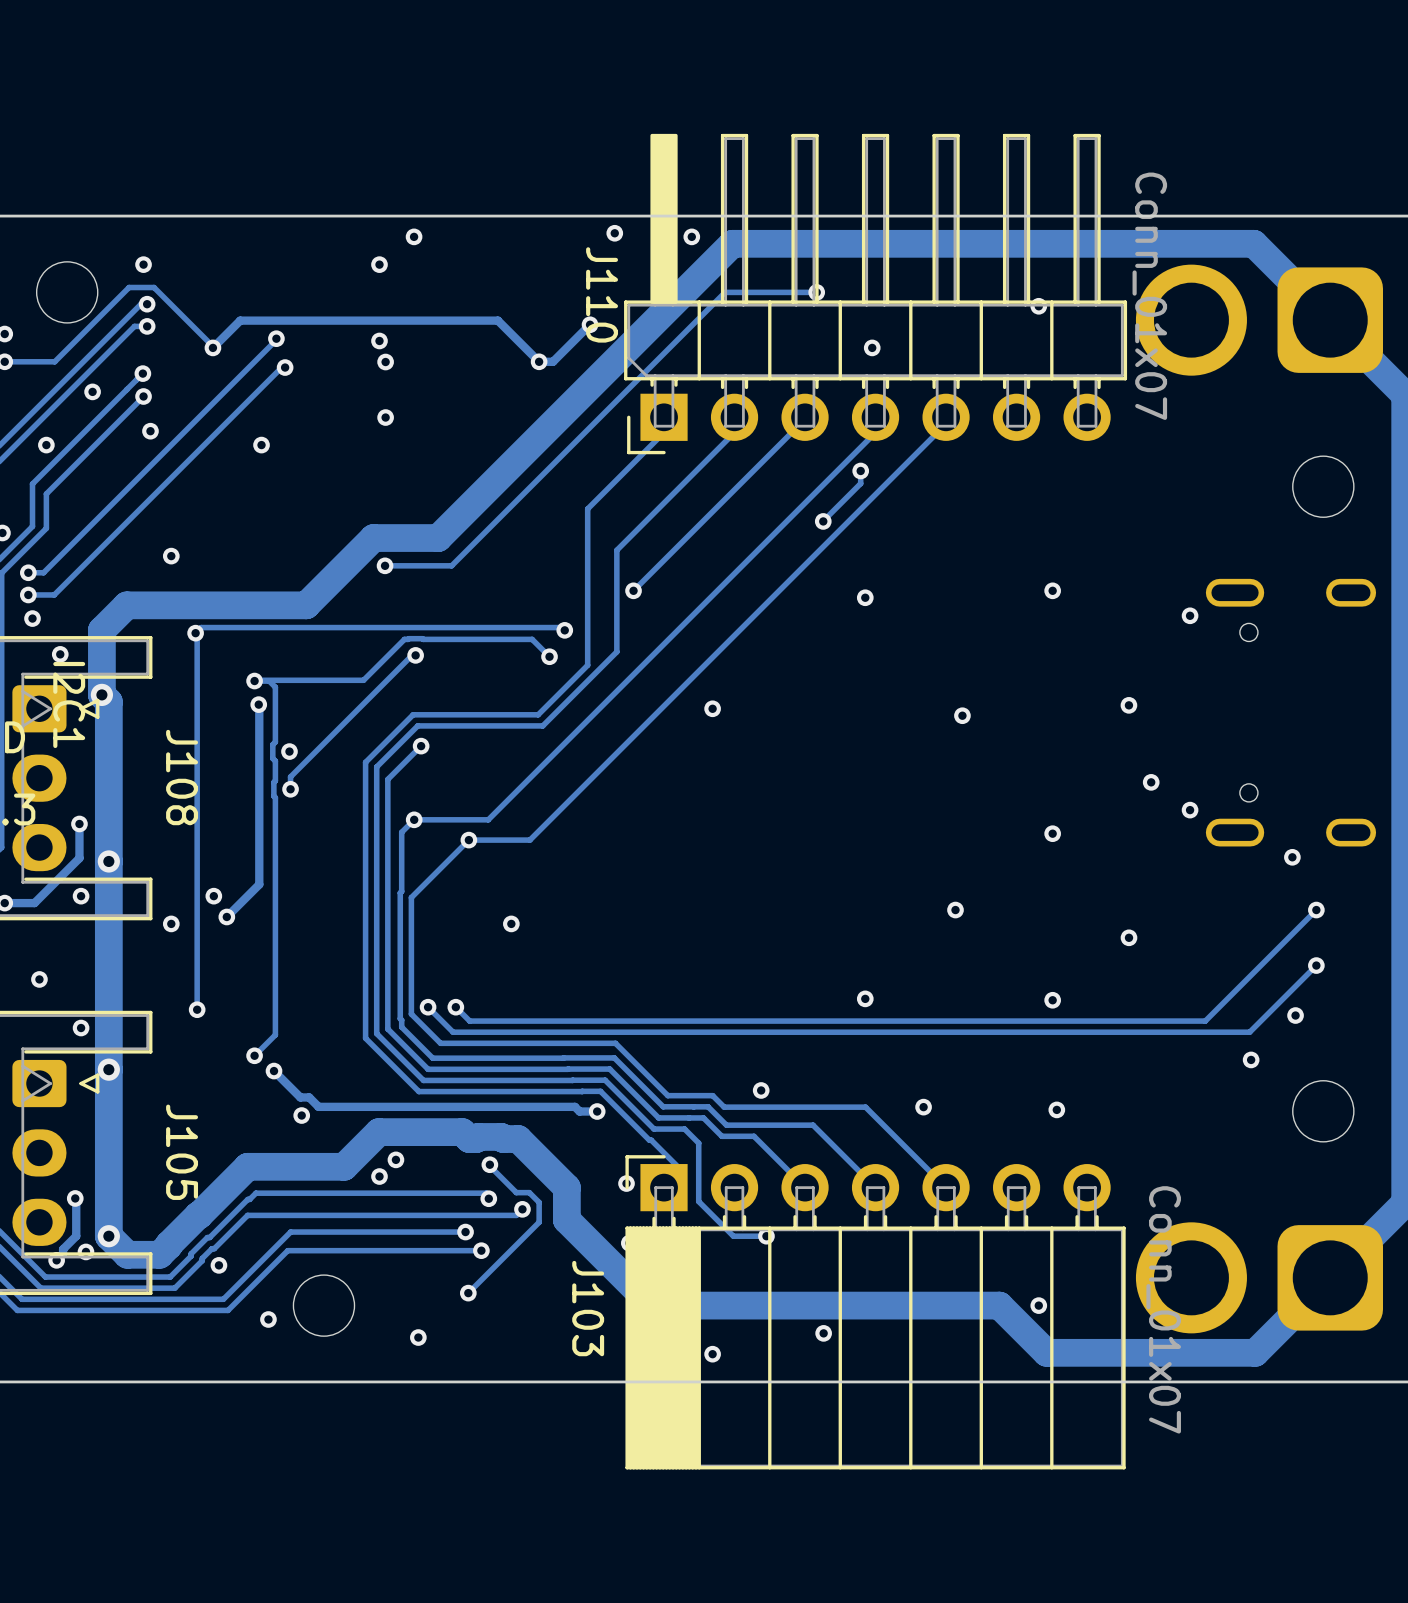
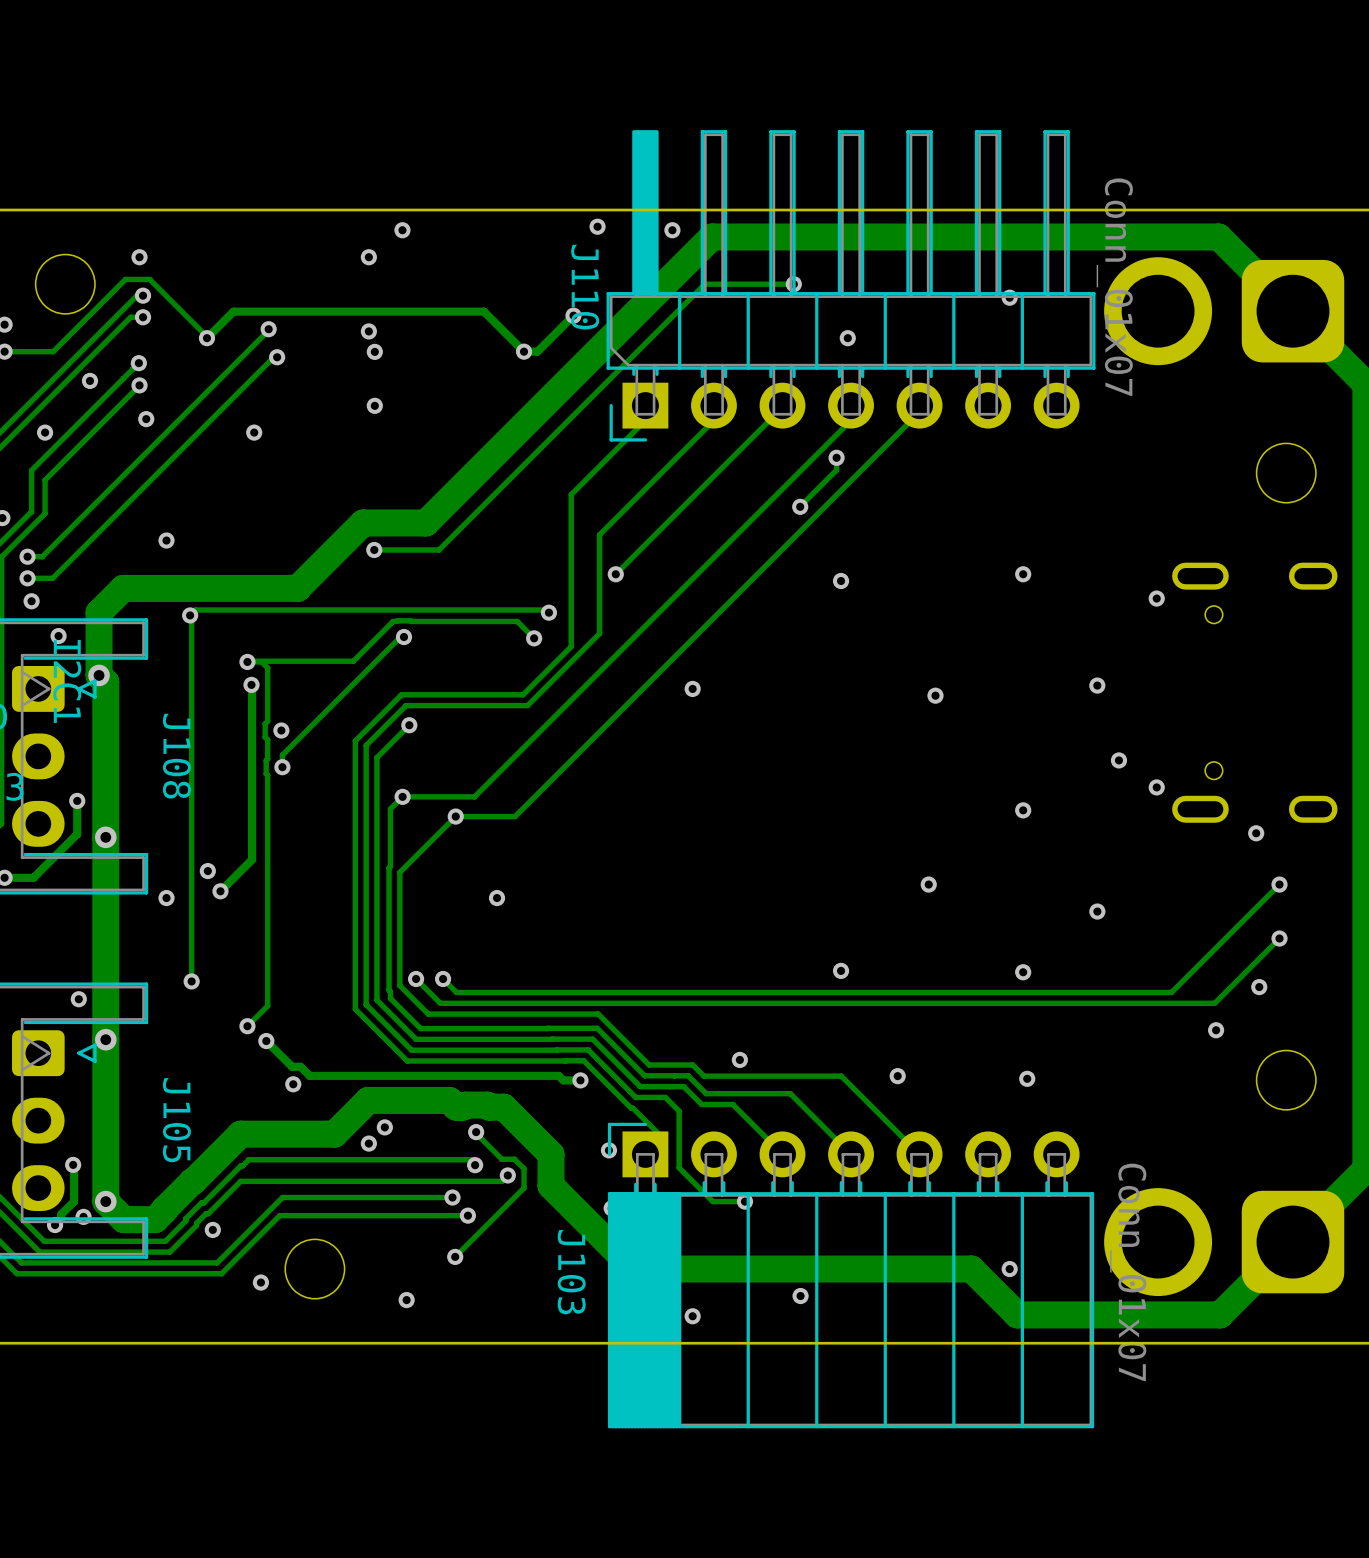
via: (81, 896) -> none
via: (39, 979) -> none

